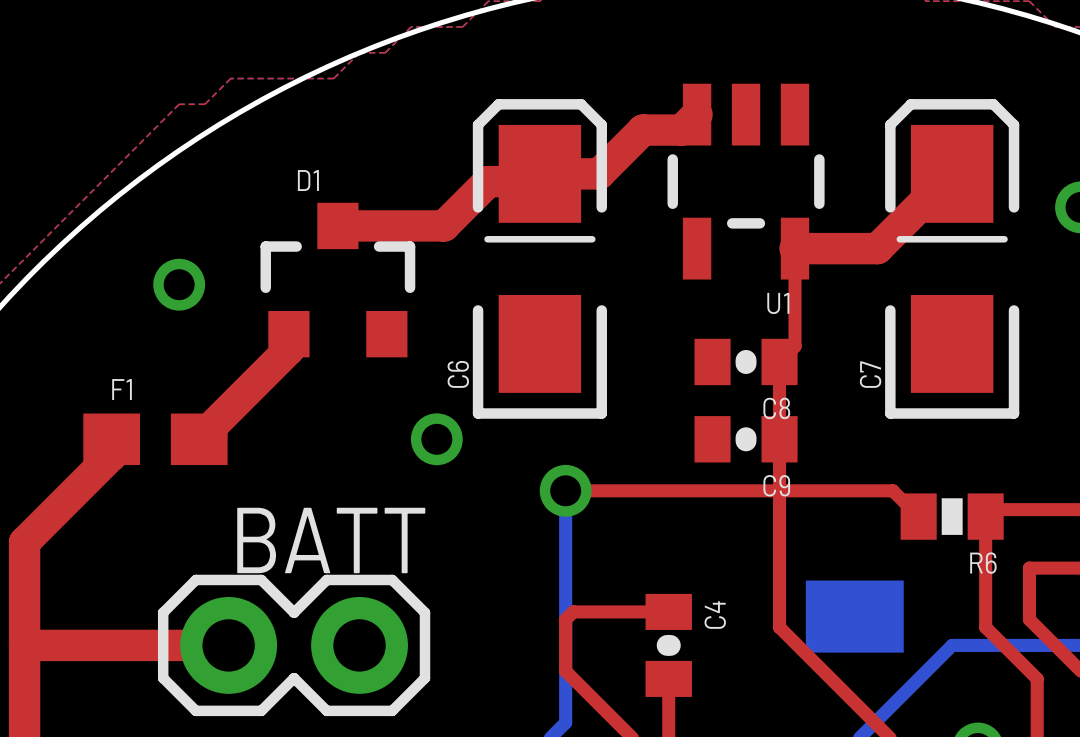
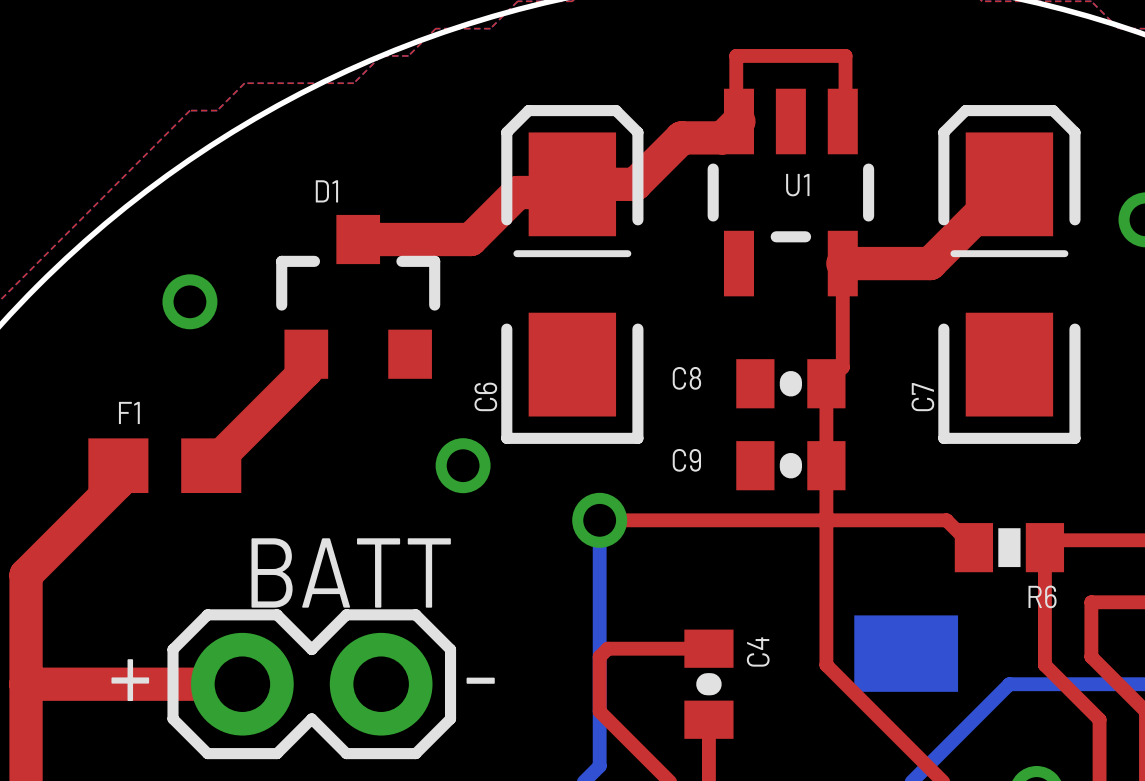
top track: none -> (738, 121) (736, 118) (736, 55) (845, 55) (845, 121) (842, 121)
U1 name position: U1 (778, 303) -> U1 (797, 185)
C8 name position: C8 (776, 408) -> C8 (686, 378)
C9 name position: C9 (776, 485) -> C9 (686, 460)
text: none -> + (130, 680)
text: none -> - (480, 680)

